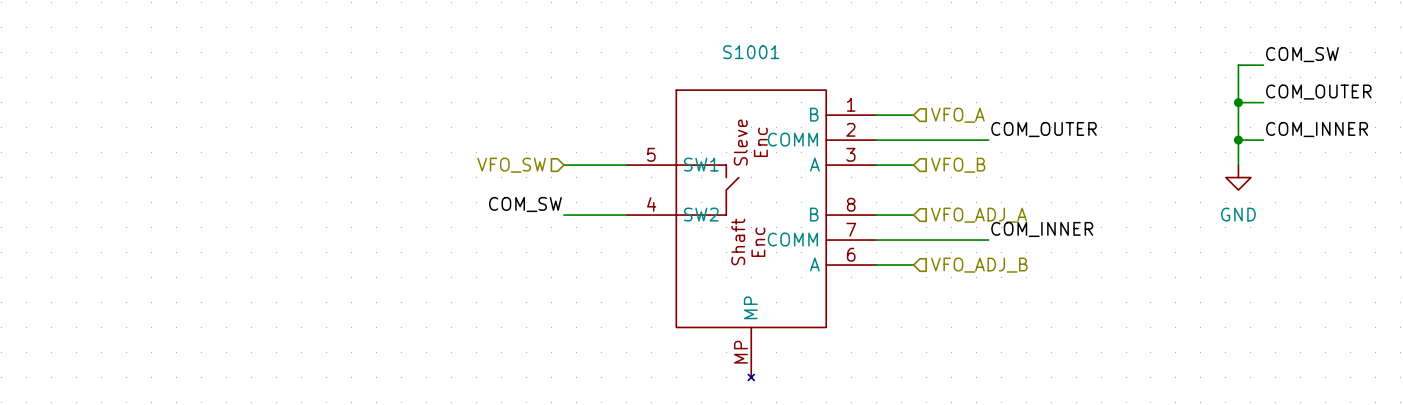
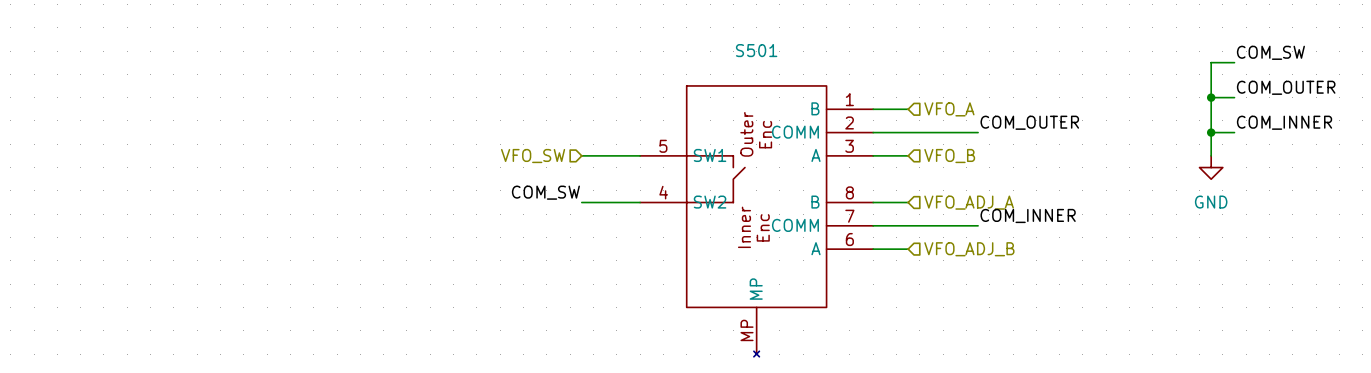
S1001 name: S1001 (751, 52) -> S501 (756, 50)
S1001 text: Sleve (740, 142) -> Outer (746, 134)
S1001 text: Shaft (738, 241) -> Inner (744, 227)

